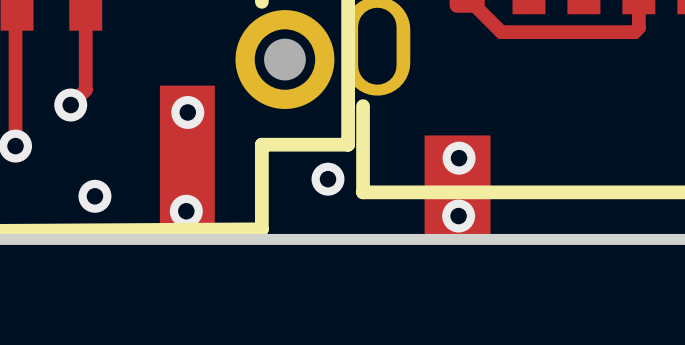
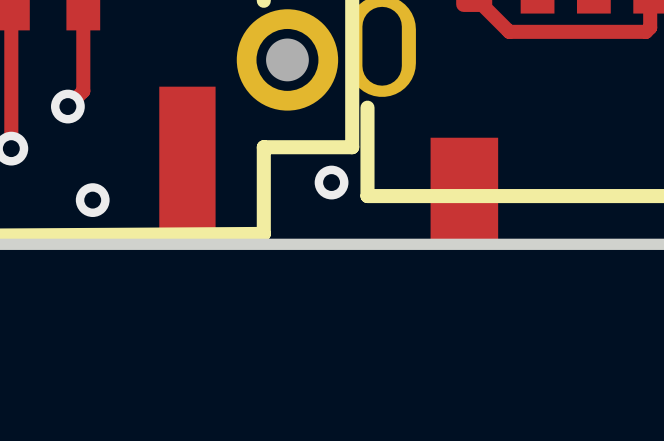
via: (187, 112) -> none
via: (459, 158) -> none
via: (186, 211) -> none
via: (458, 216) -> none

